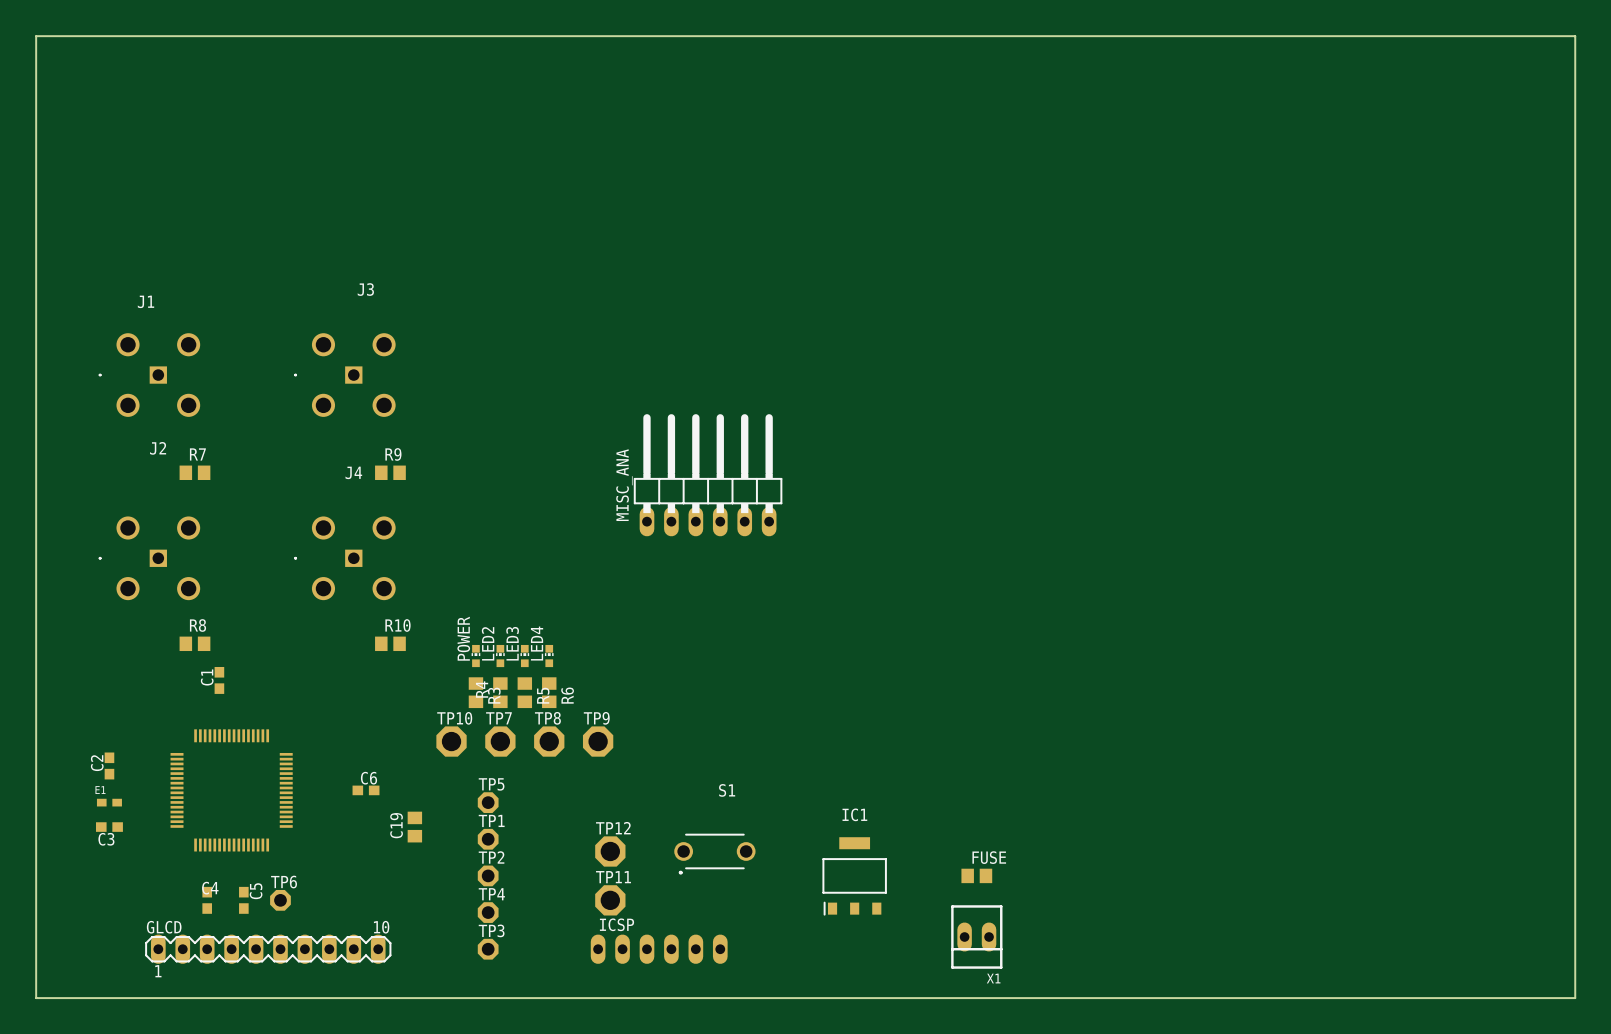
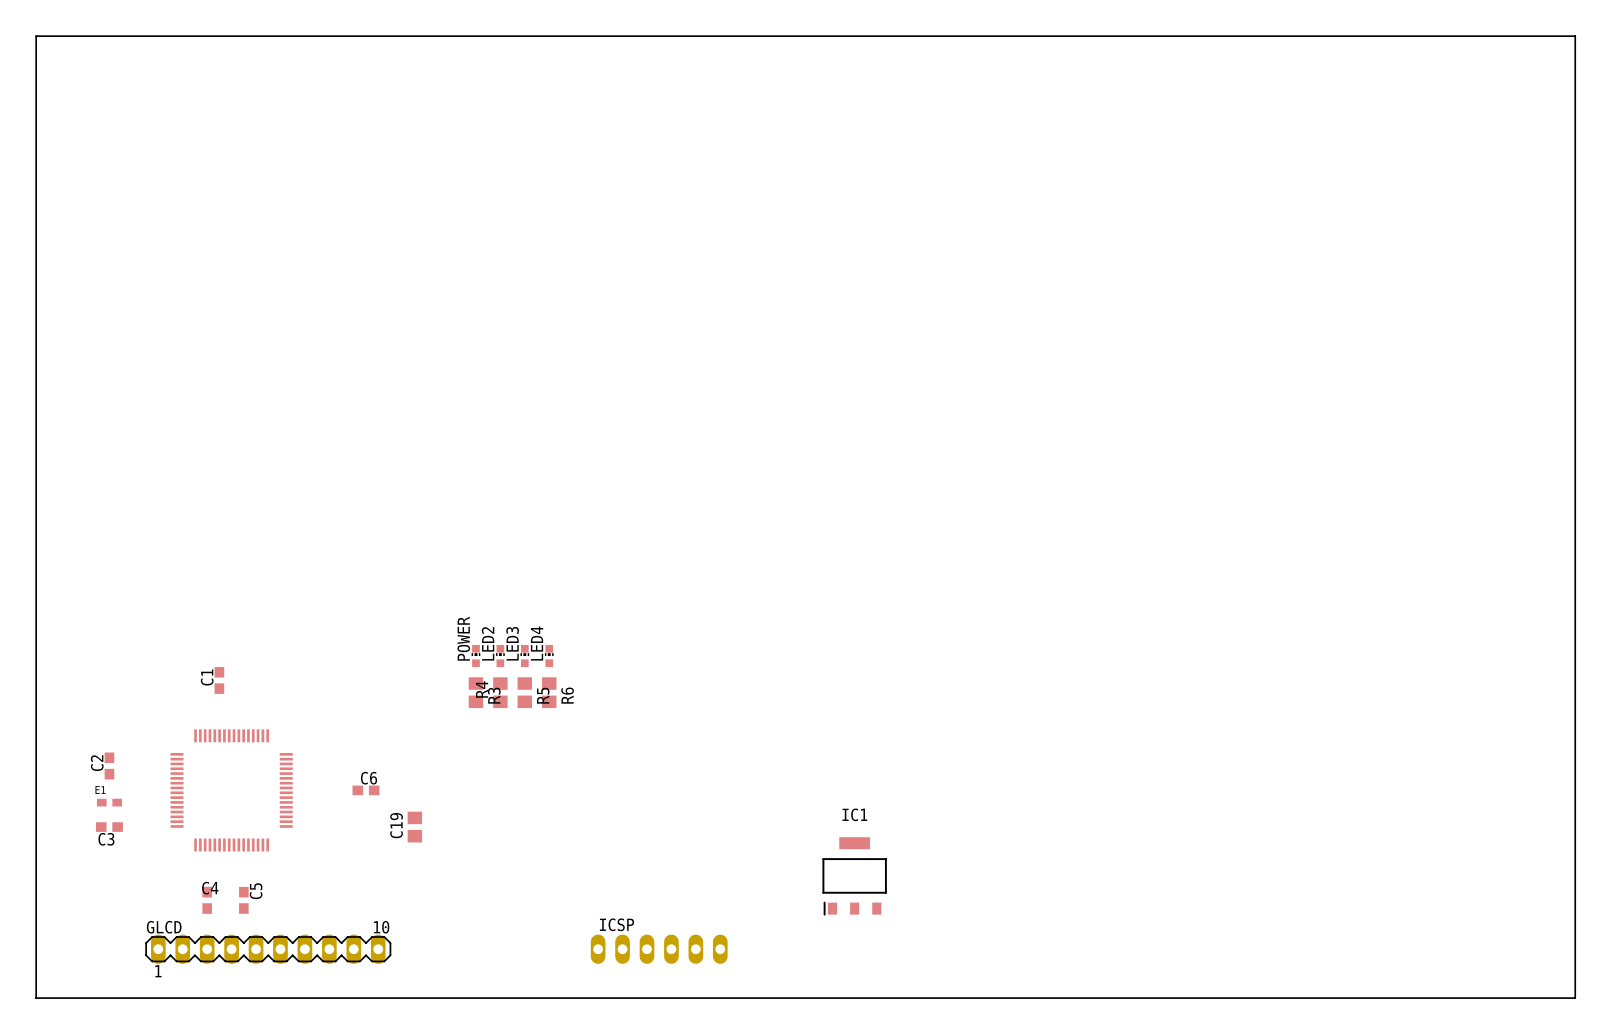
J1: (149, 375) -> none
J3: (345, 375) -> none
R7: (194, 472) -> none
R9: (390, 472) -> none
MISC_ANA: (708, 475) -> none
J2: (149, 558) -> none
J4: (345, 558) -> none
R8: (194, 643) -> none
R10: (390, 643) -> none
TP10: (451, 741) -> none
TP7: (500, 741) -> none
TP8: (549, 741) -> none
TP9: (598, 741) -> none
TP5: (488, 802) -> none
TP1: (488, 839) -> none
TP12: (610, 851) -> none
S1: (714, 854) -> none
TP2: (488, 875) -> none
FUSE: (976, 875) -> none
TP6: (280, 900) -> none
TP11: (610, 900) -> none
TP4: (488, 912) -> none
X1: (976, 937) -> none
TP3: (488, 949) -> none

